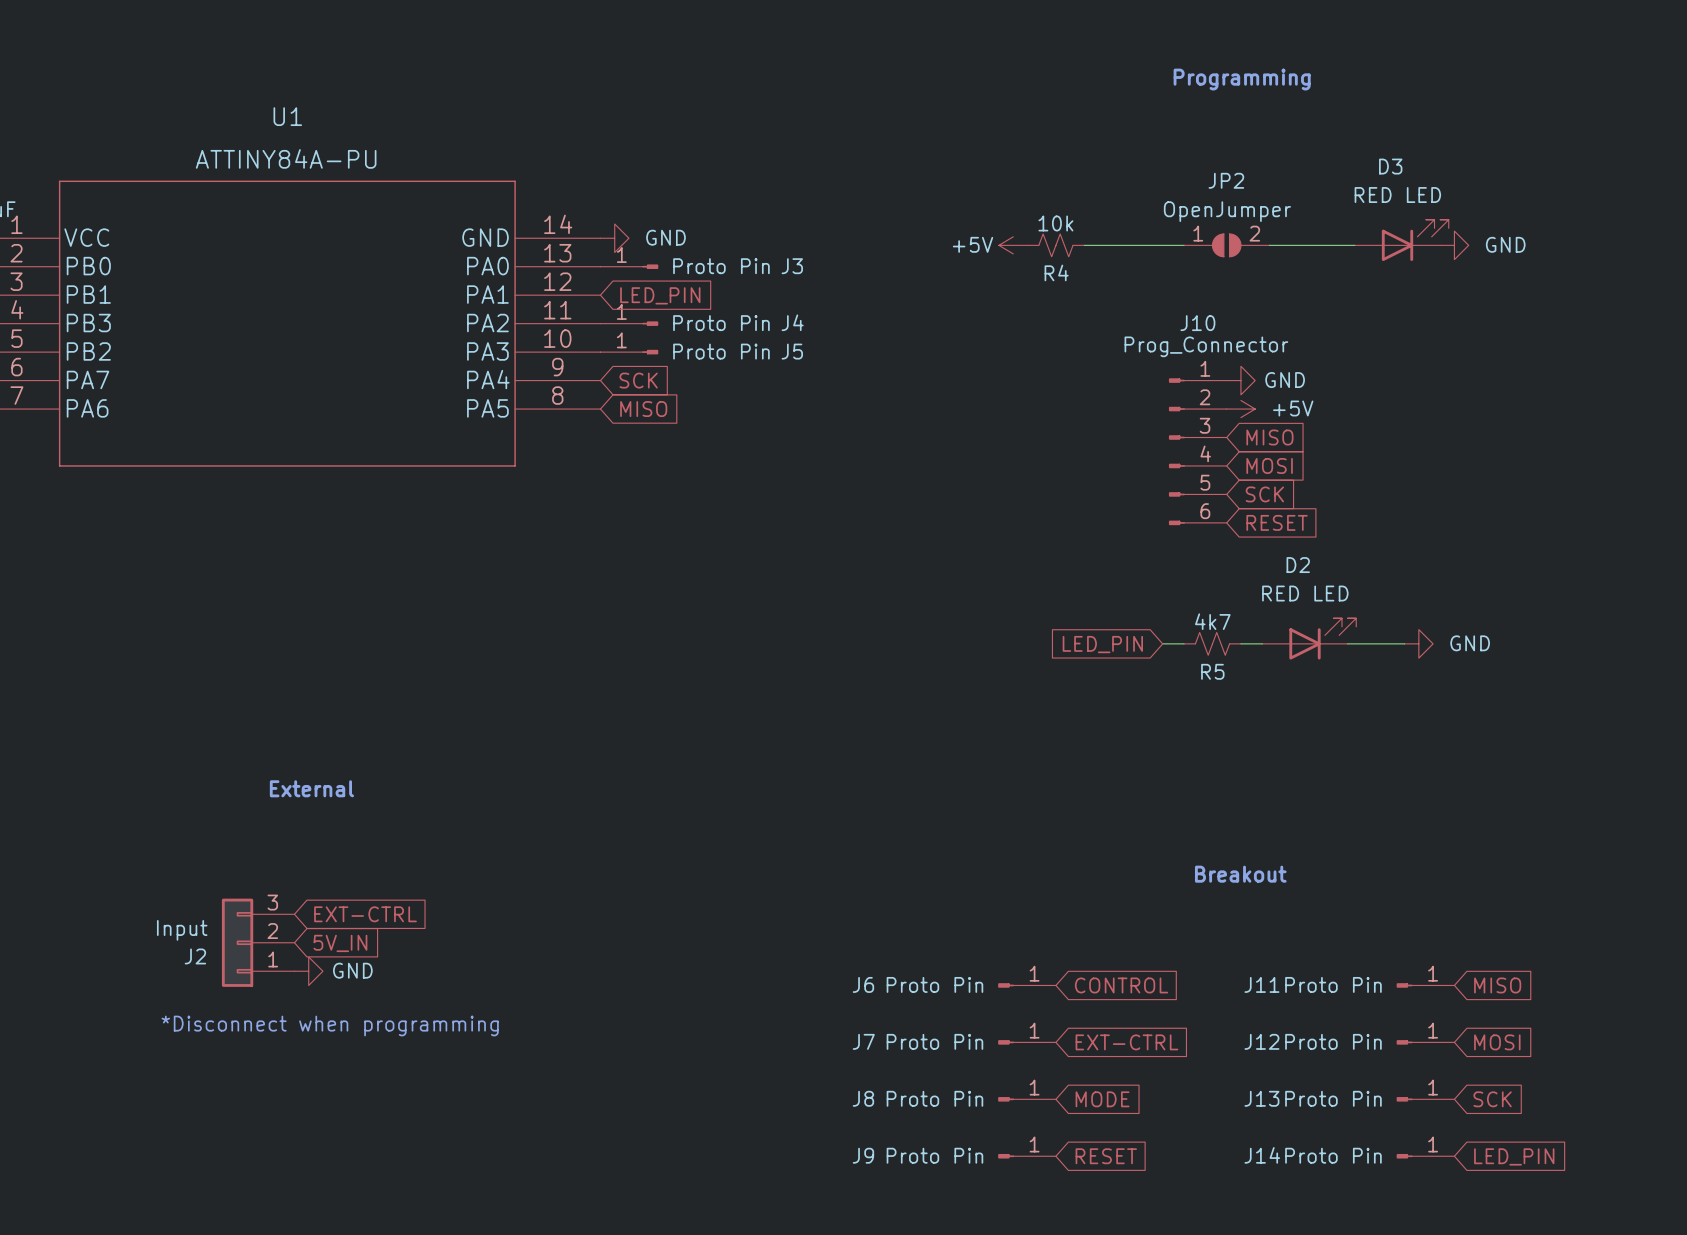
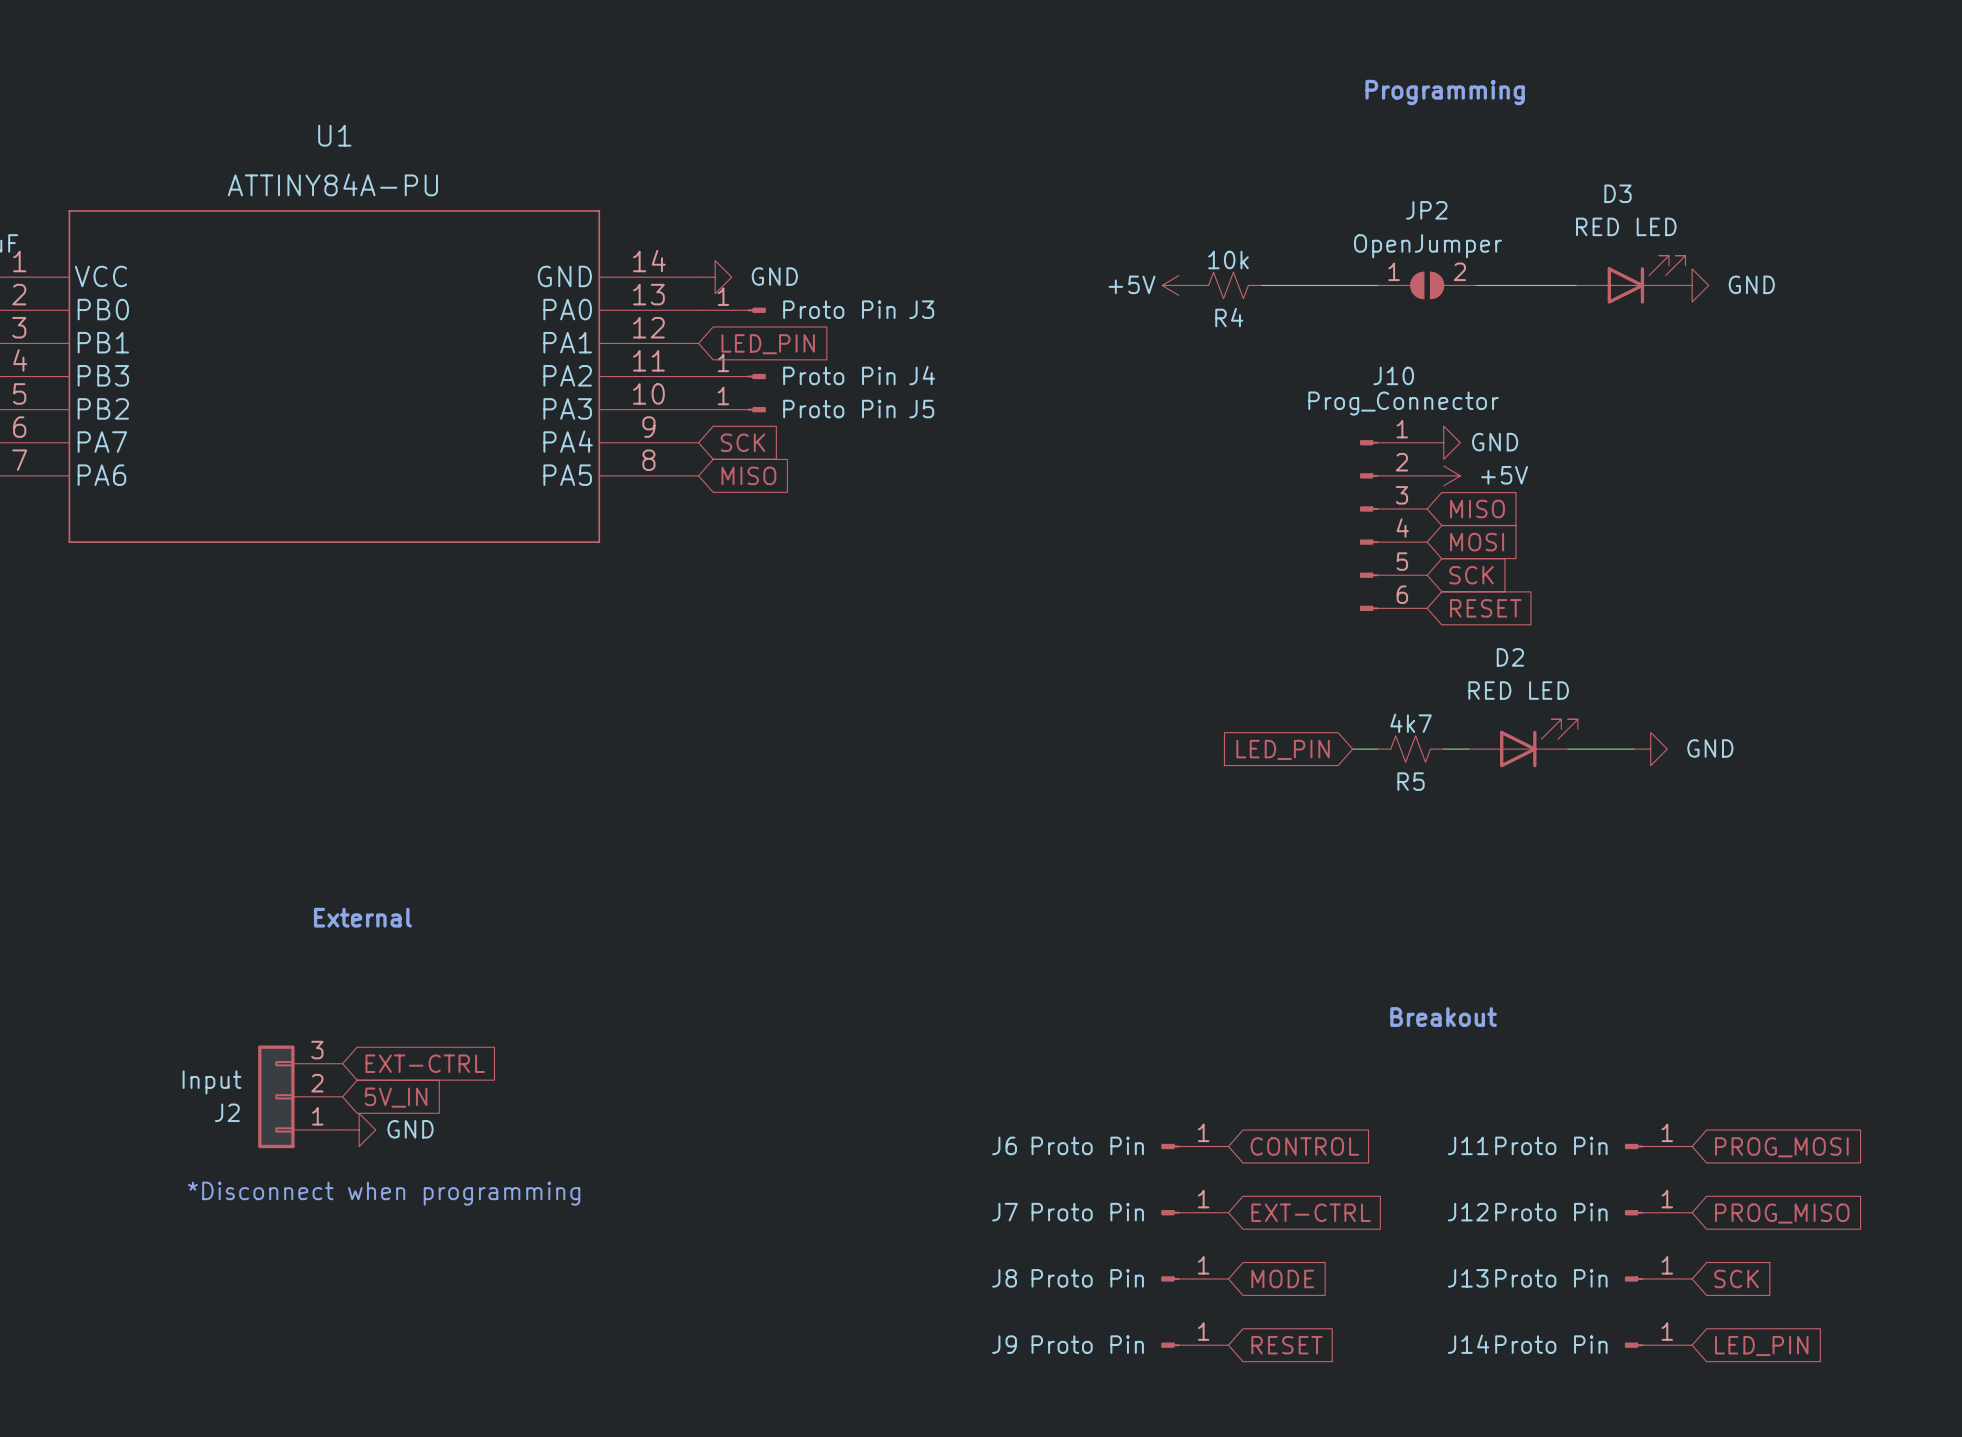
global label: MISO (1497, 985) -> PROG_MOSI (1781, 1147)
global label: MOSI (1497, 1042) -> PROG_MISO (1782, 1213)

